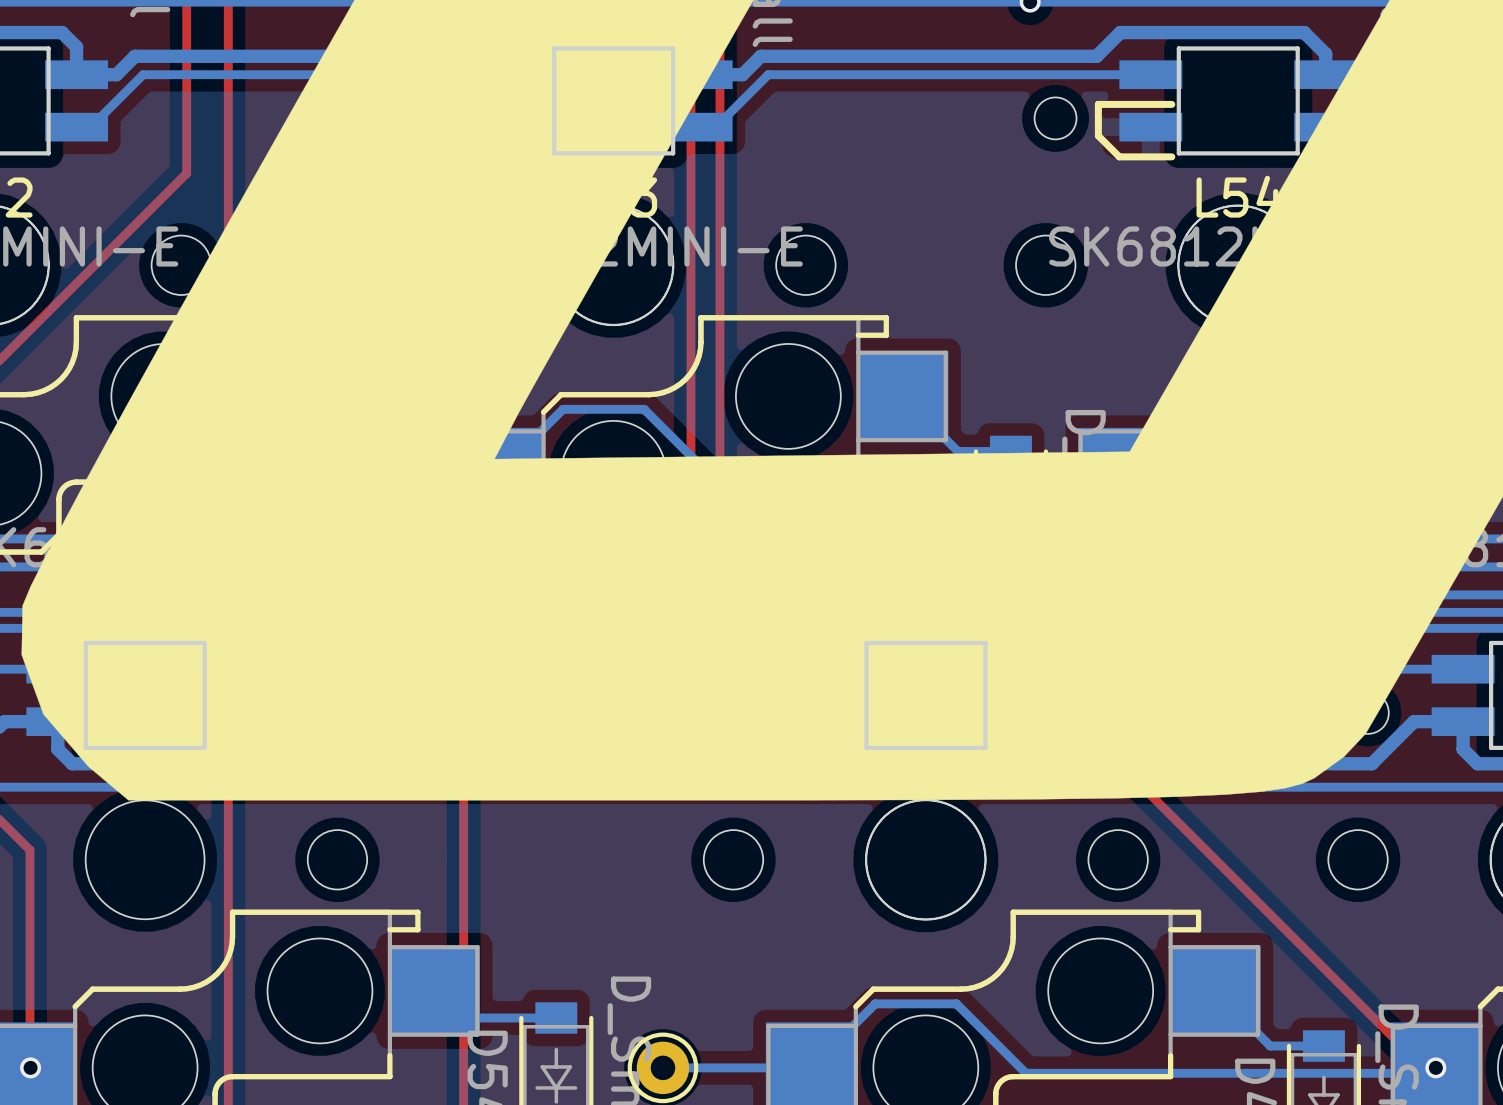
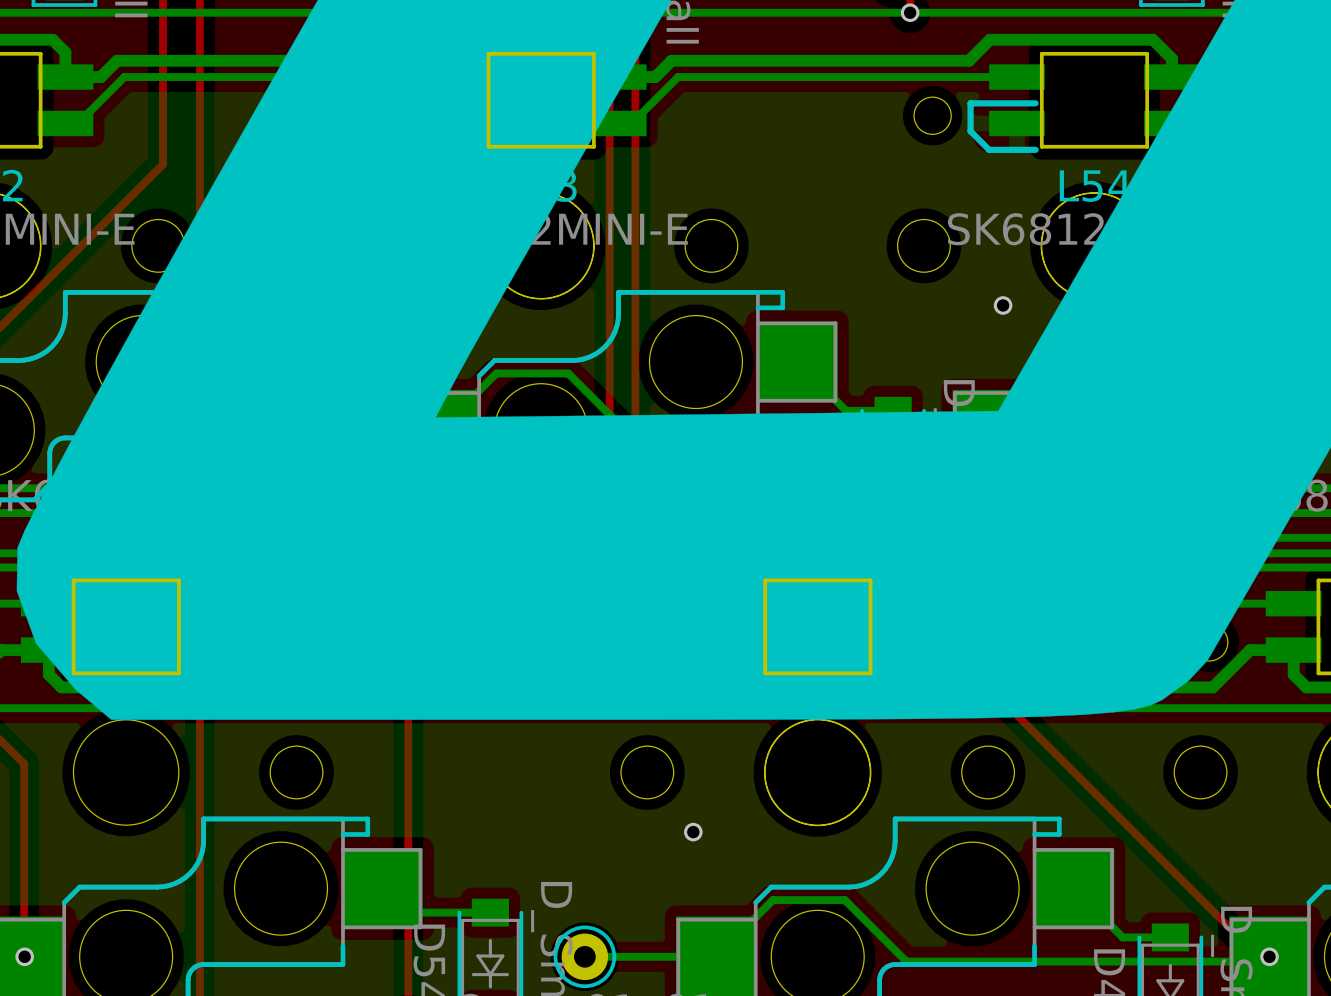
via: none -> (1003, 305)
via: none -> (693, 832)

